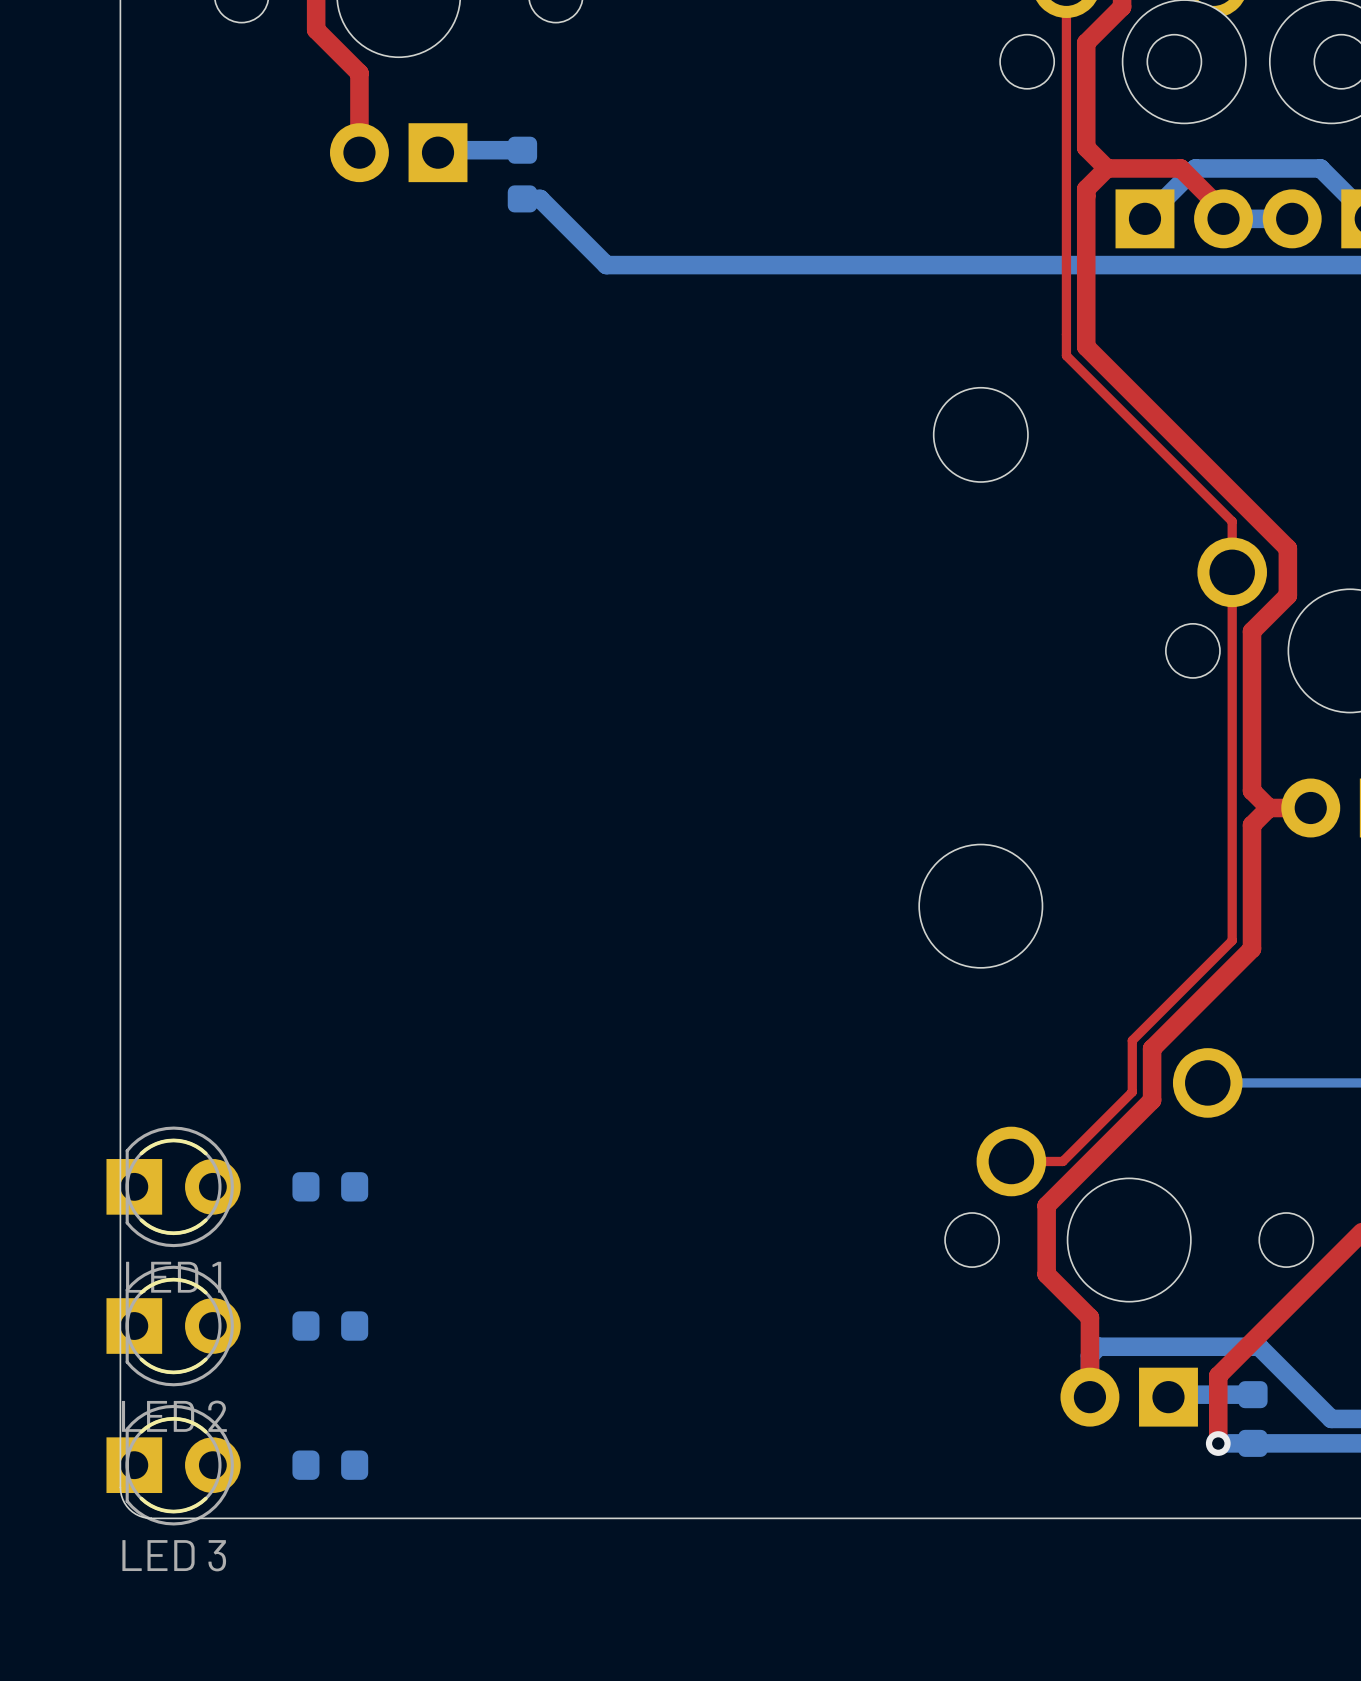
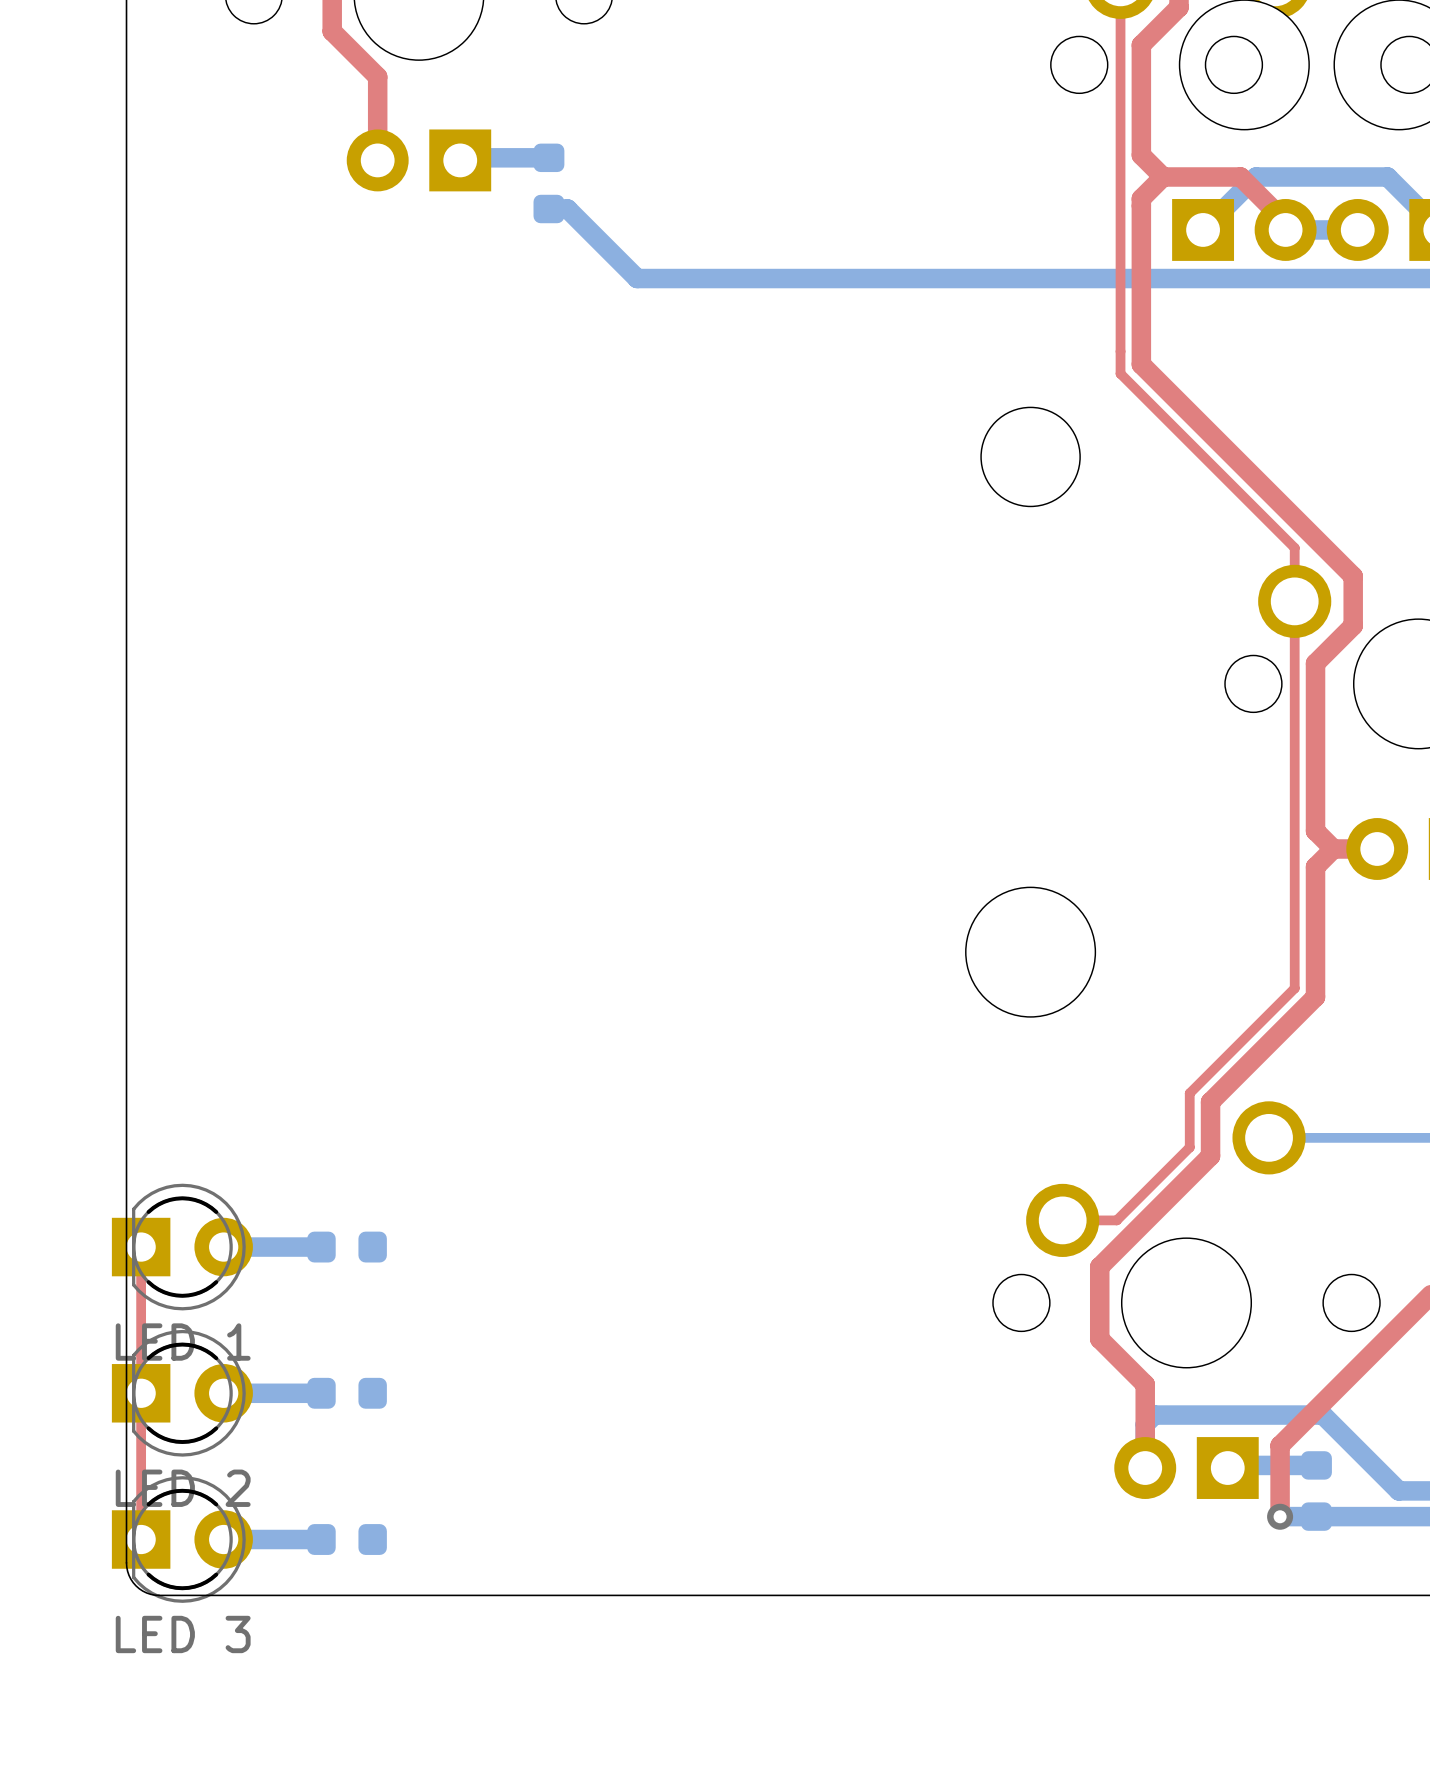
top track: none -> (141, 1247) (141, 1539)
bottom track: none -> (223, 1247) (321, 1247)
bottom track: none -> (223, 1393) (321, 1393)
bottom track: none -> (223, 1539) (321, 1539)

